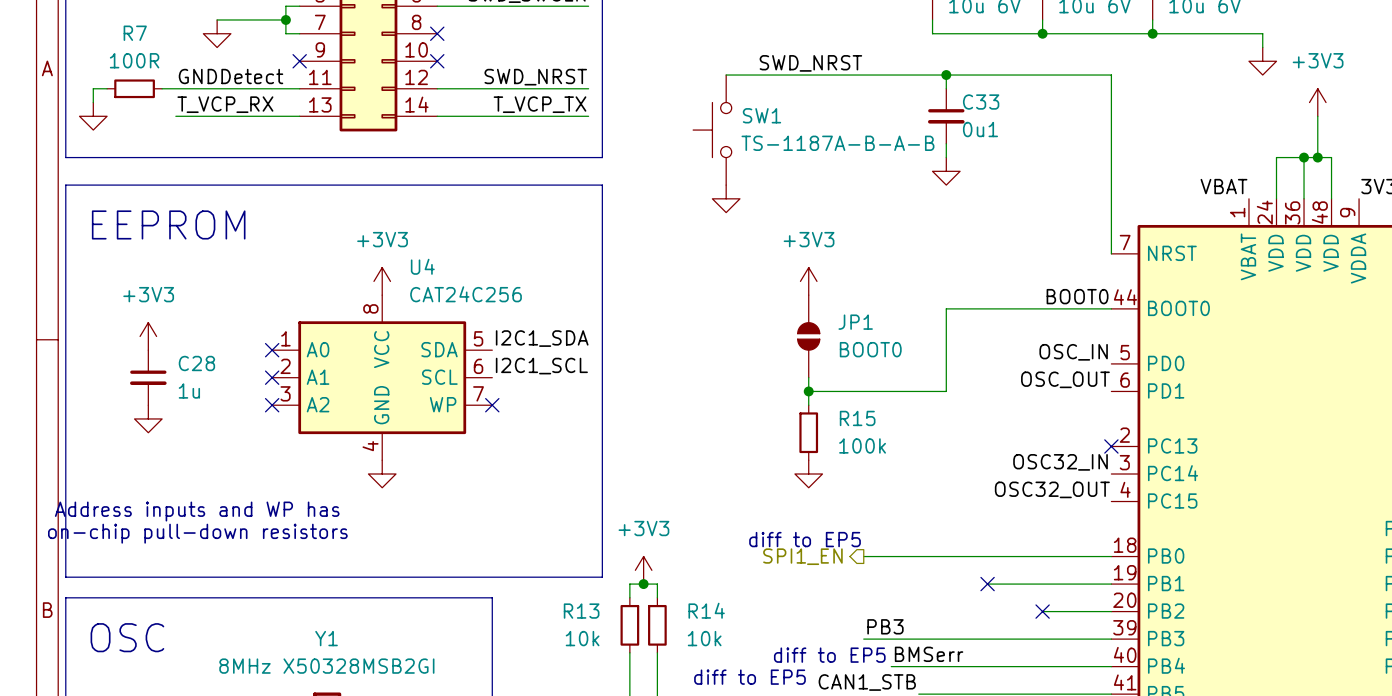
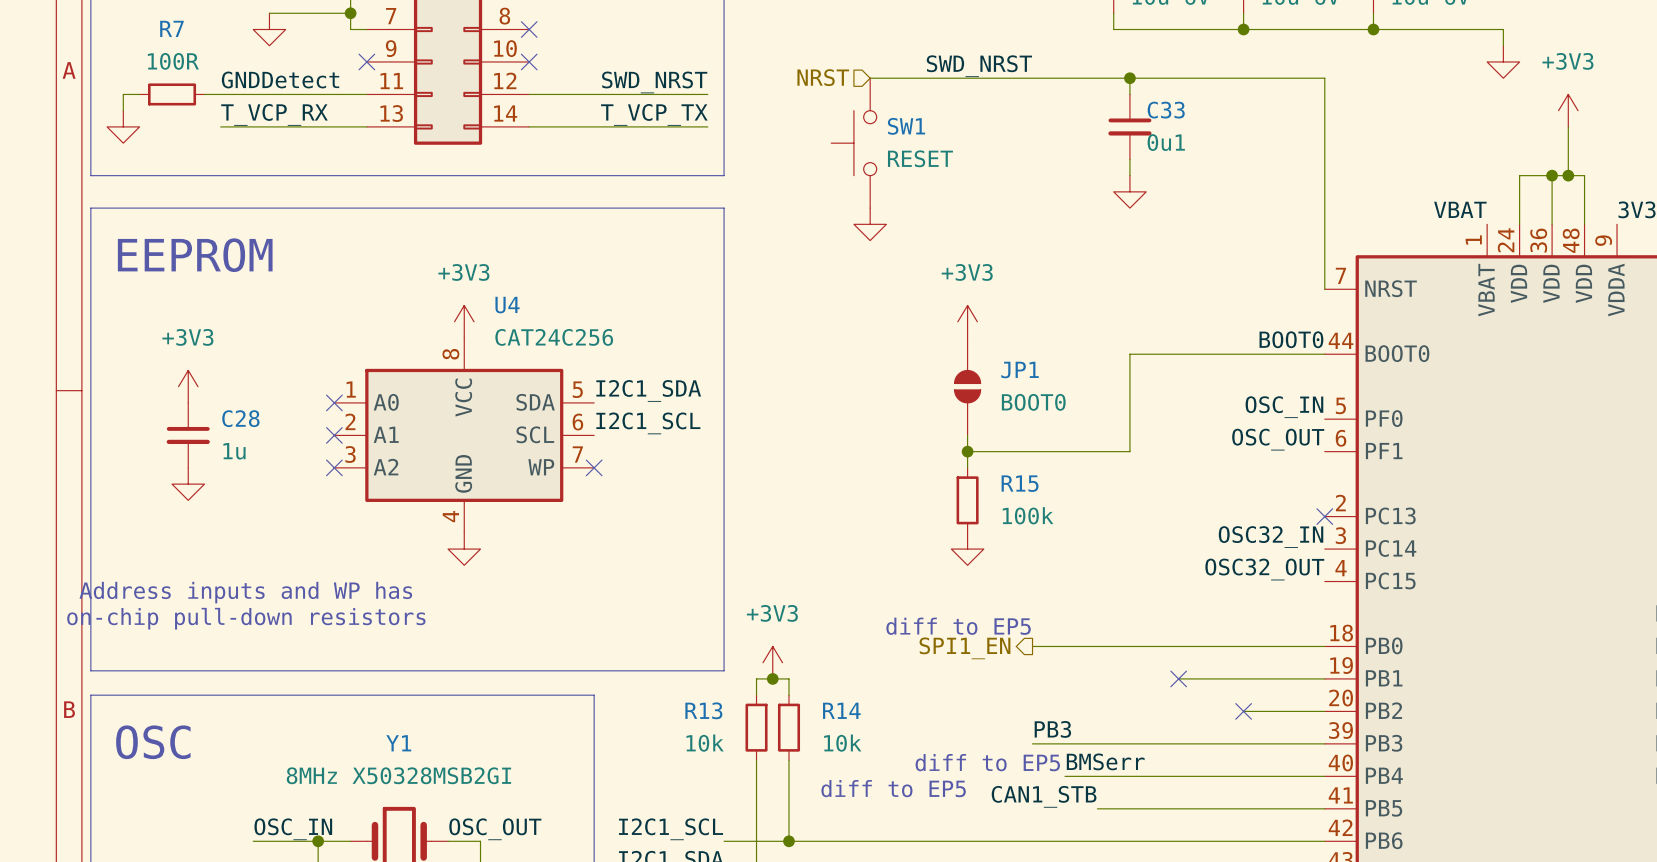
hierarchical label: none -> NRST (823, 77)
SW1 value: TS-1187A-B-A-B (837, 143) -> RESET (920, 158)
part pin name: PD0 (1166, 363) -> PF0 (1384, 418)
part pin name: PD1 (1166, 390) -> PF1 (1384, 451)

